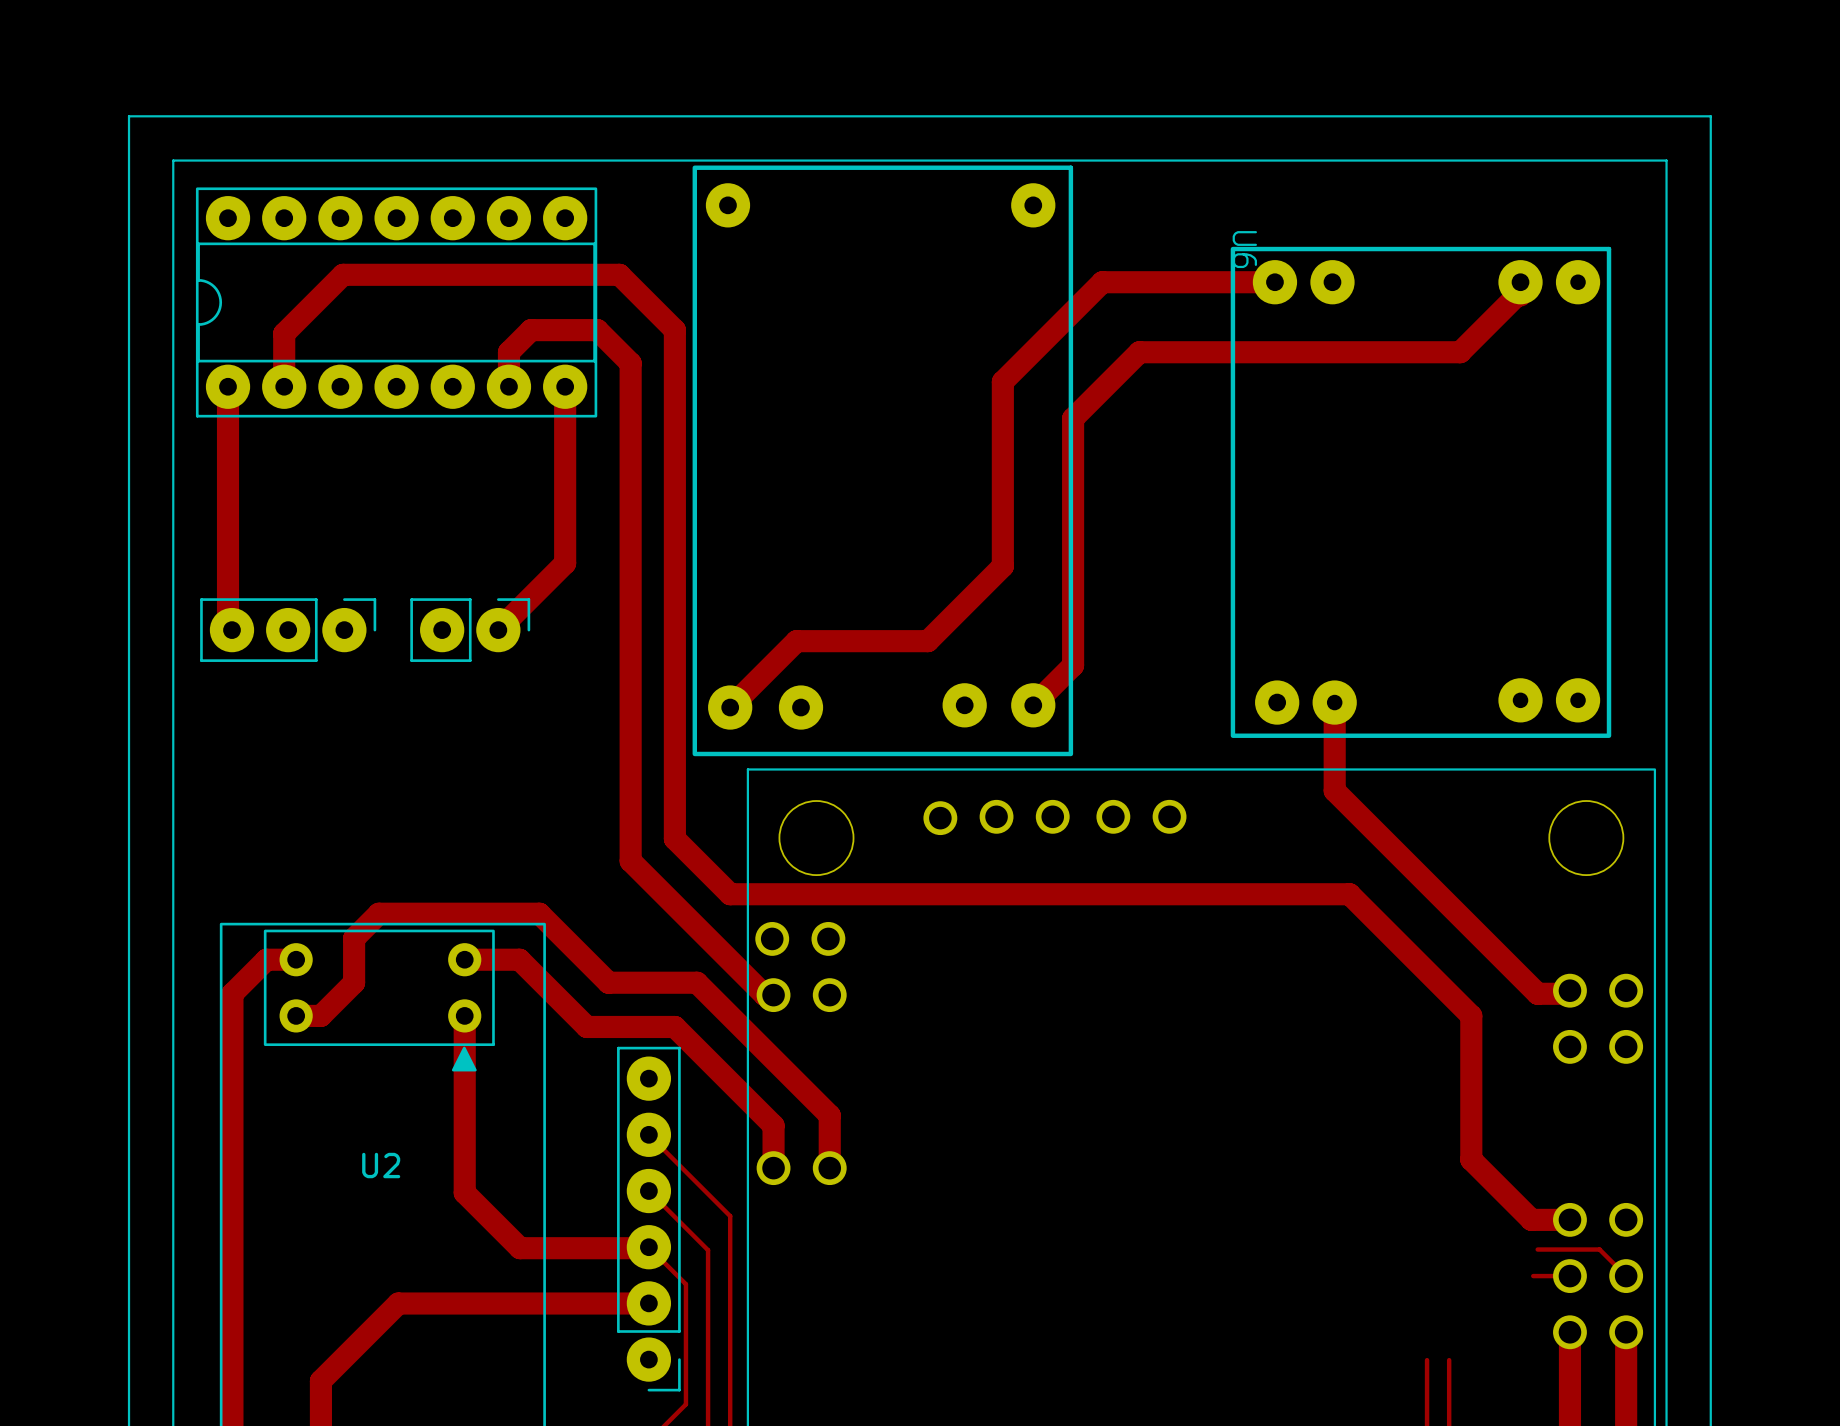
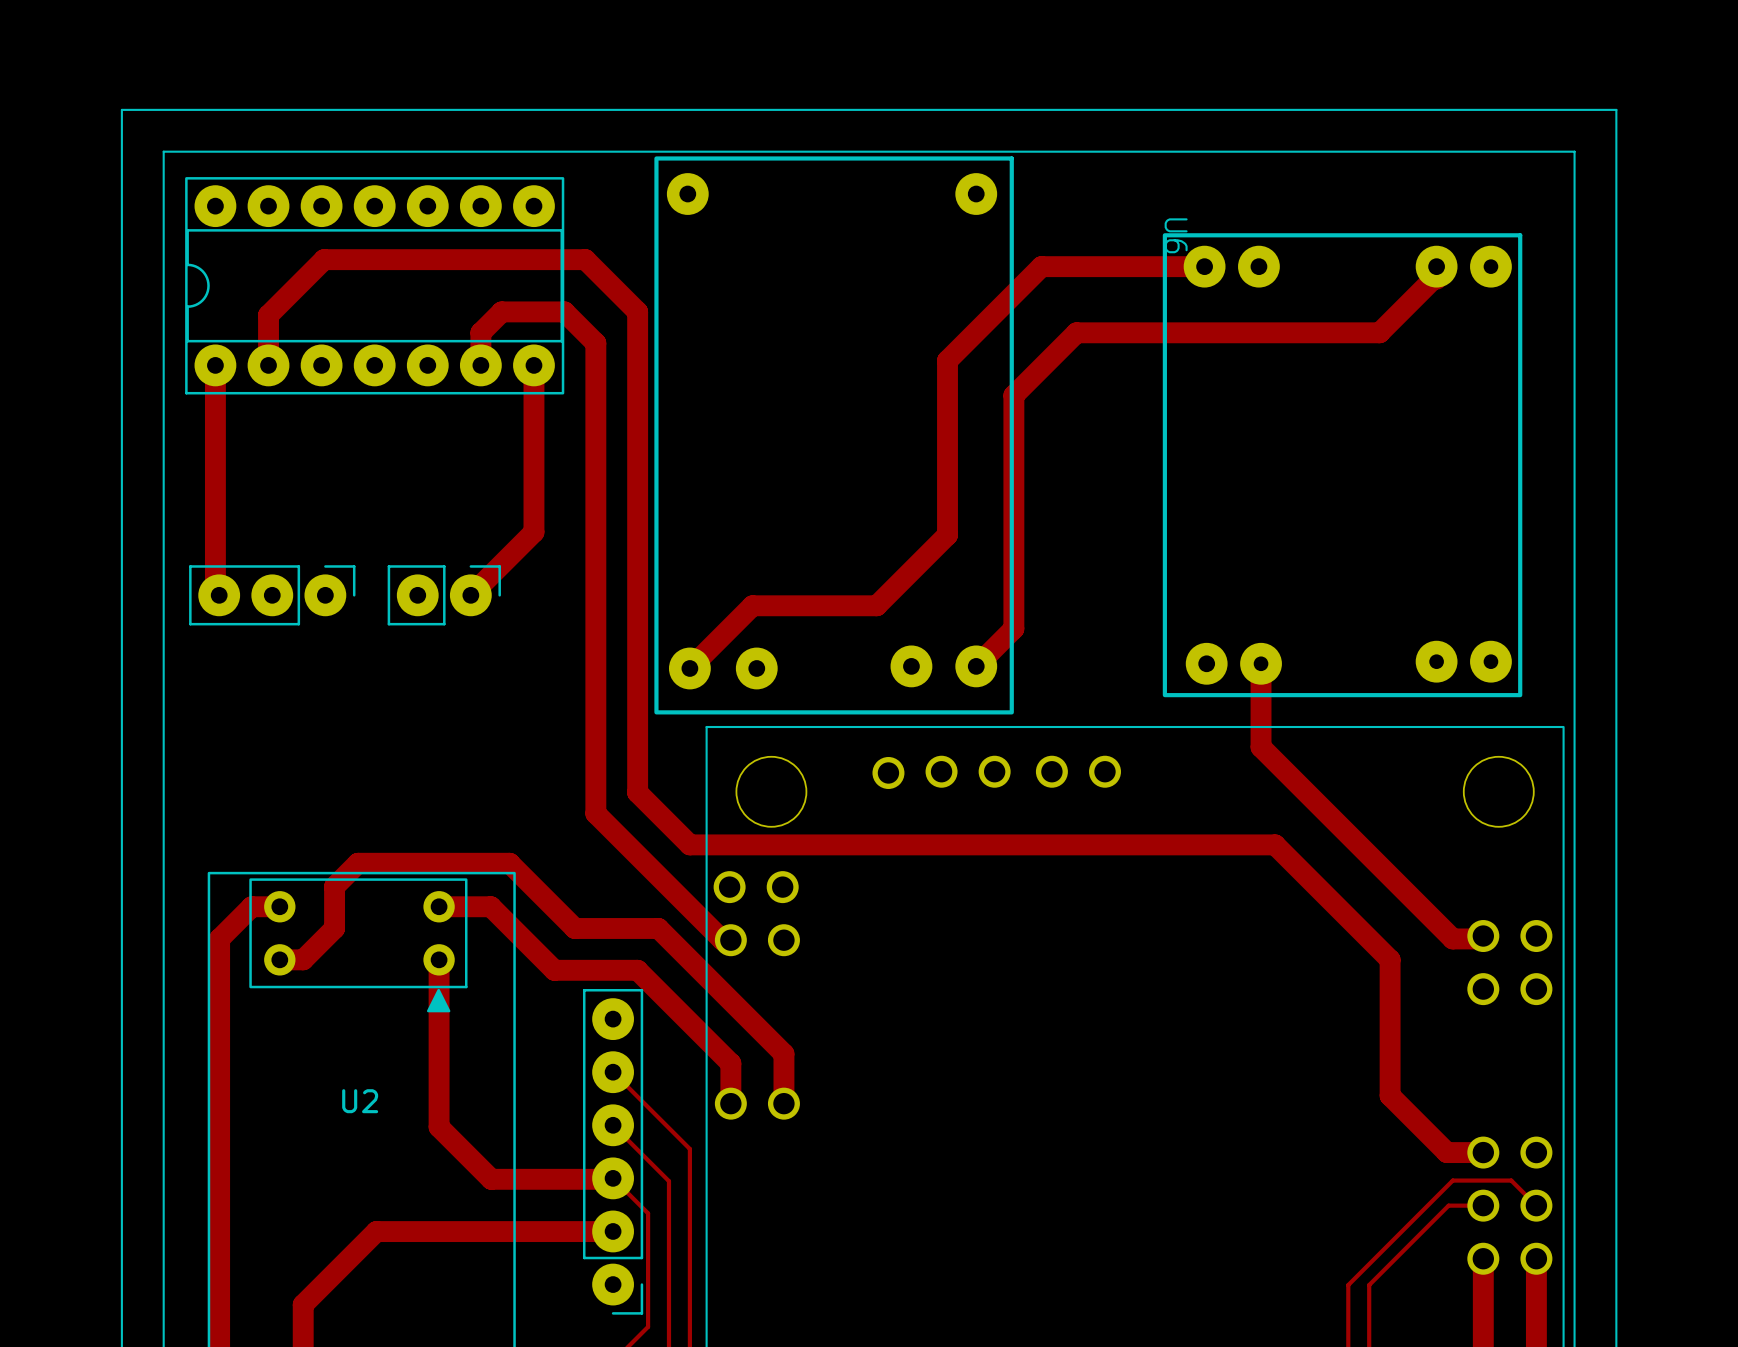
track: none -> (1452, 1180) (1348, 1285)
track: none -> (1448, 1205) (1369, 1285)

